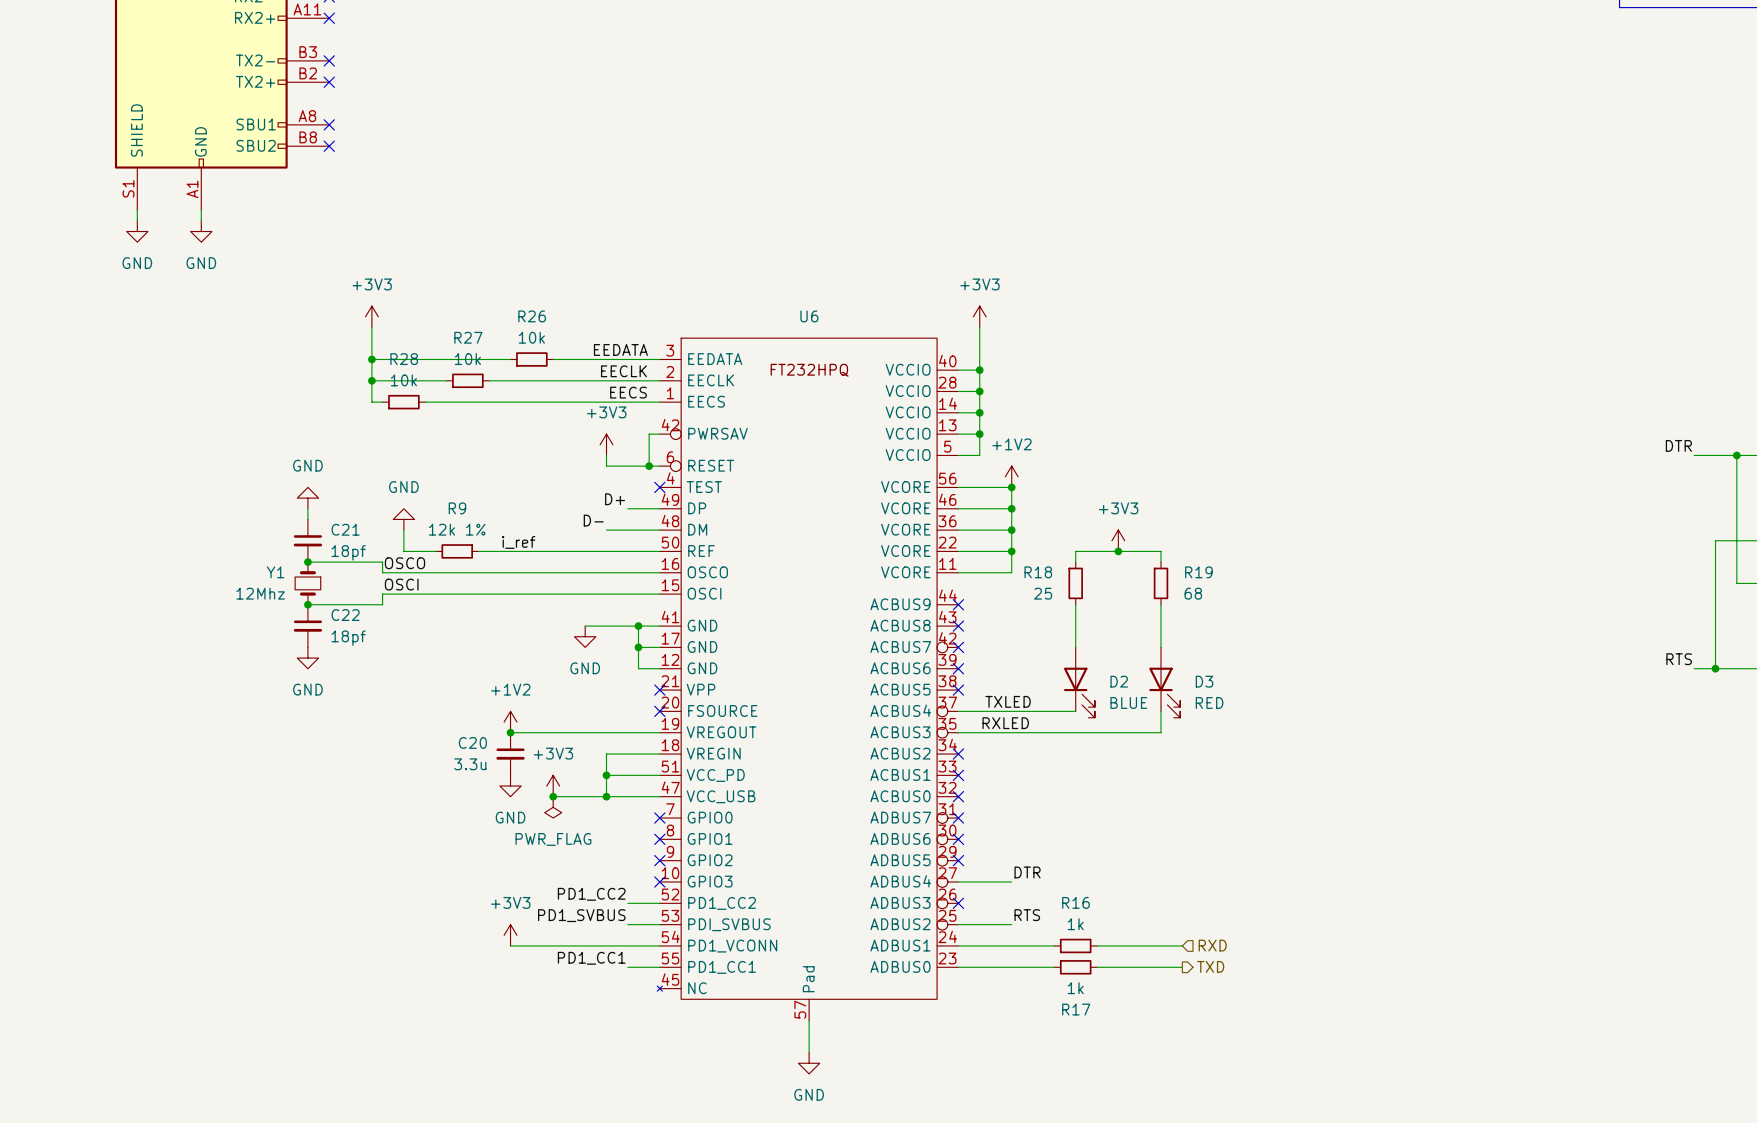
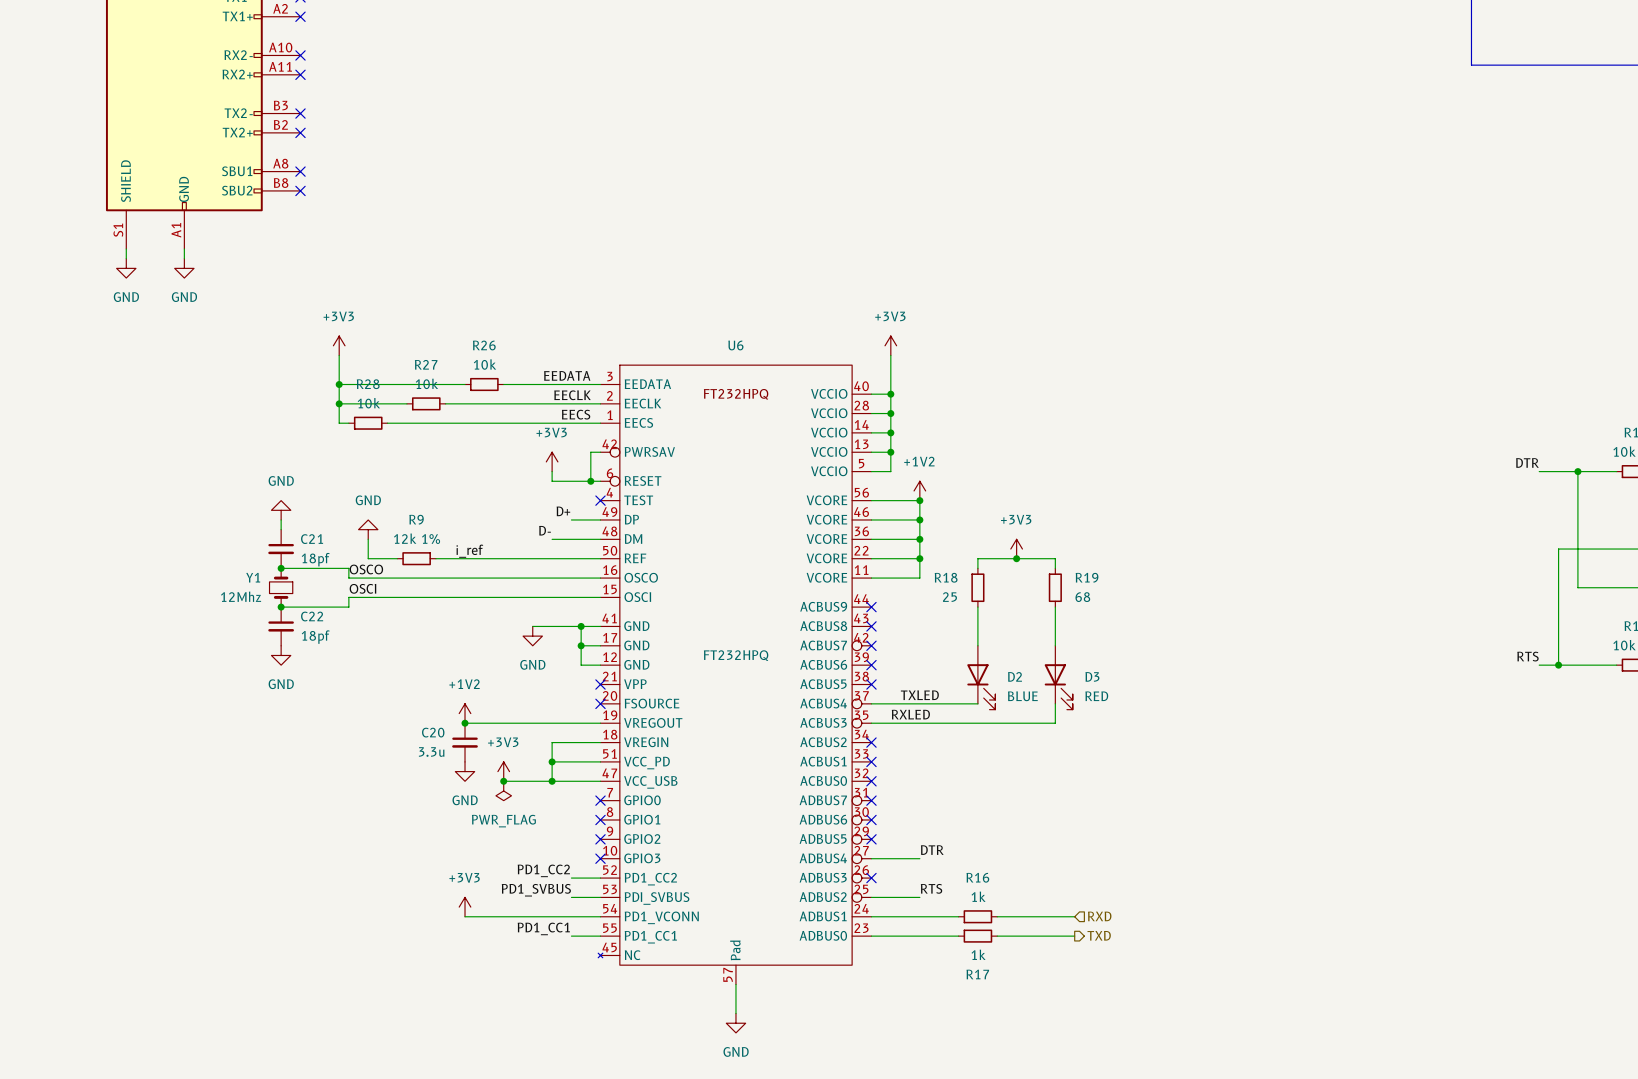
U6 value: none -> FT232HPQ (736, 655)

